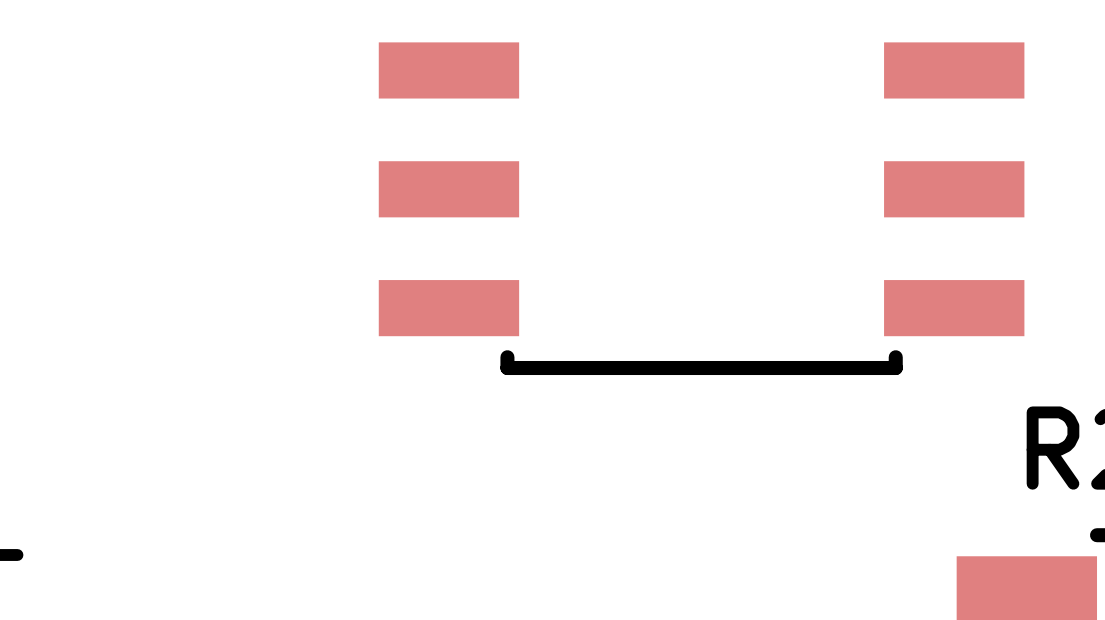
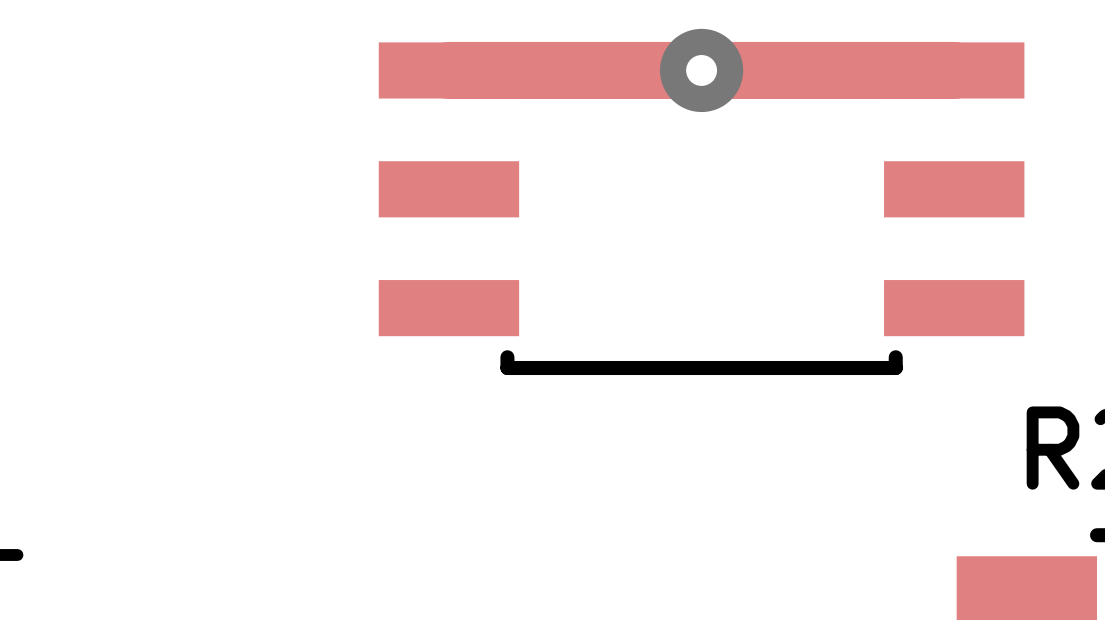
track: none -> (448, 70) (954, 70)
via: none -> (701, 70)

